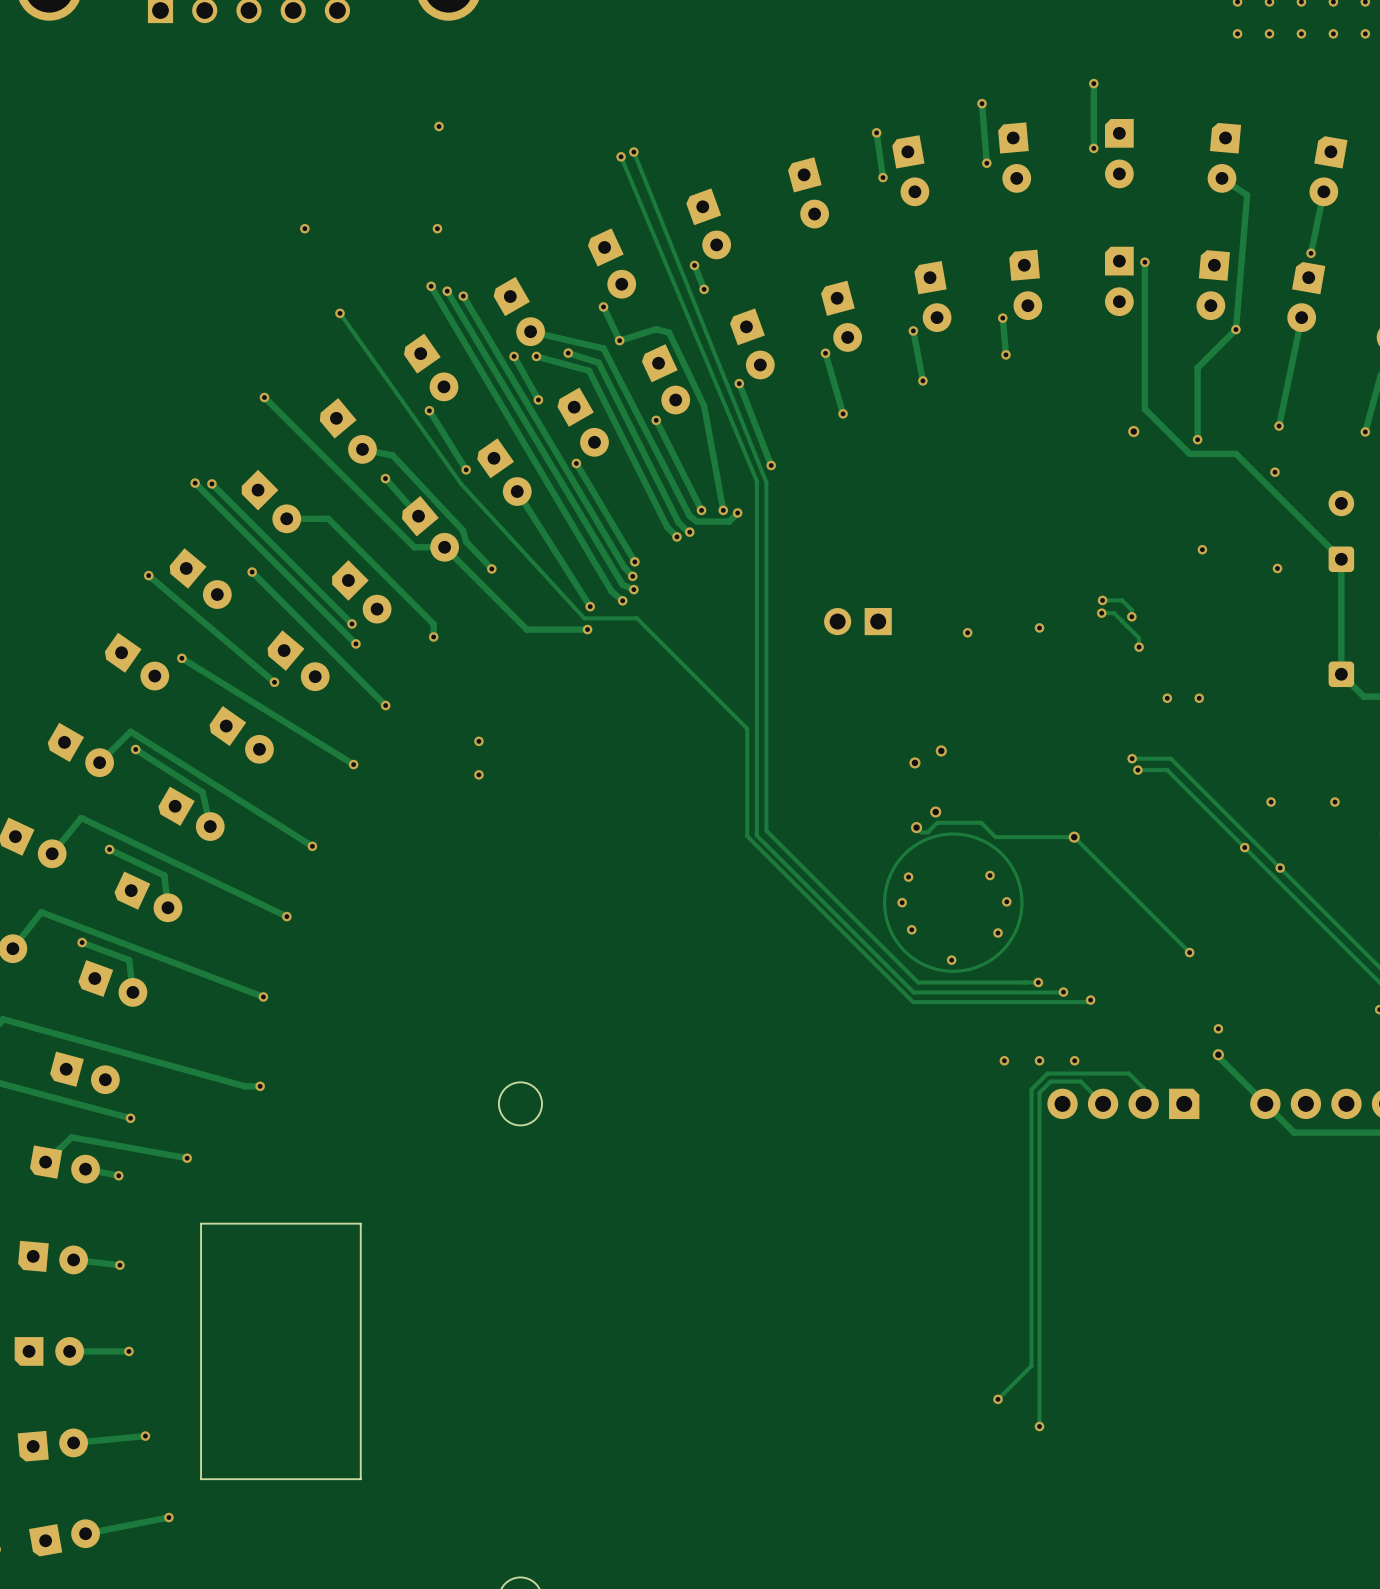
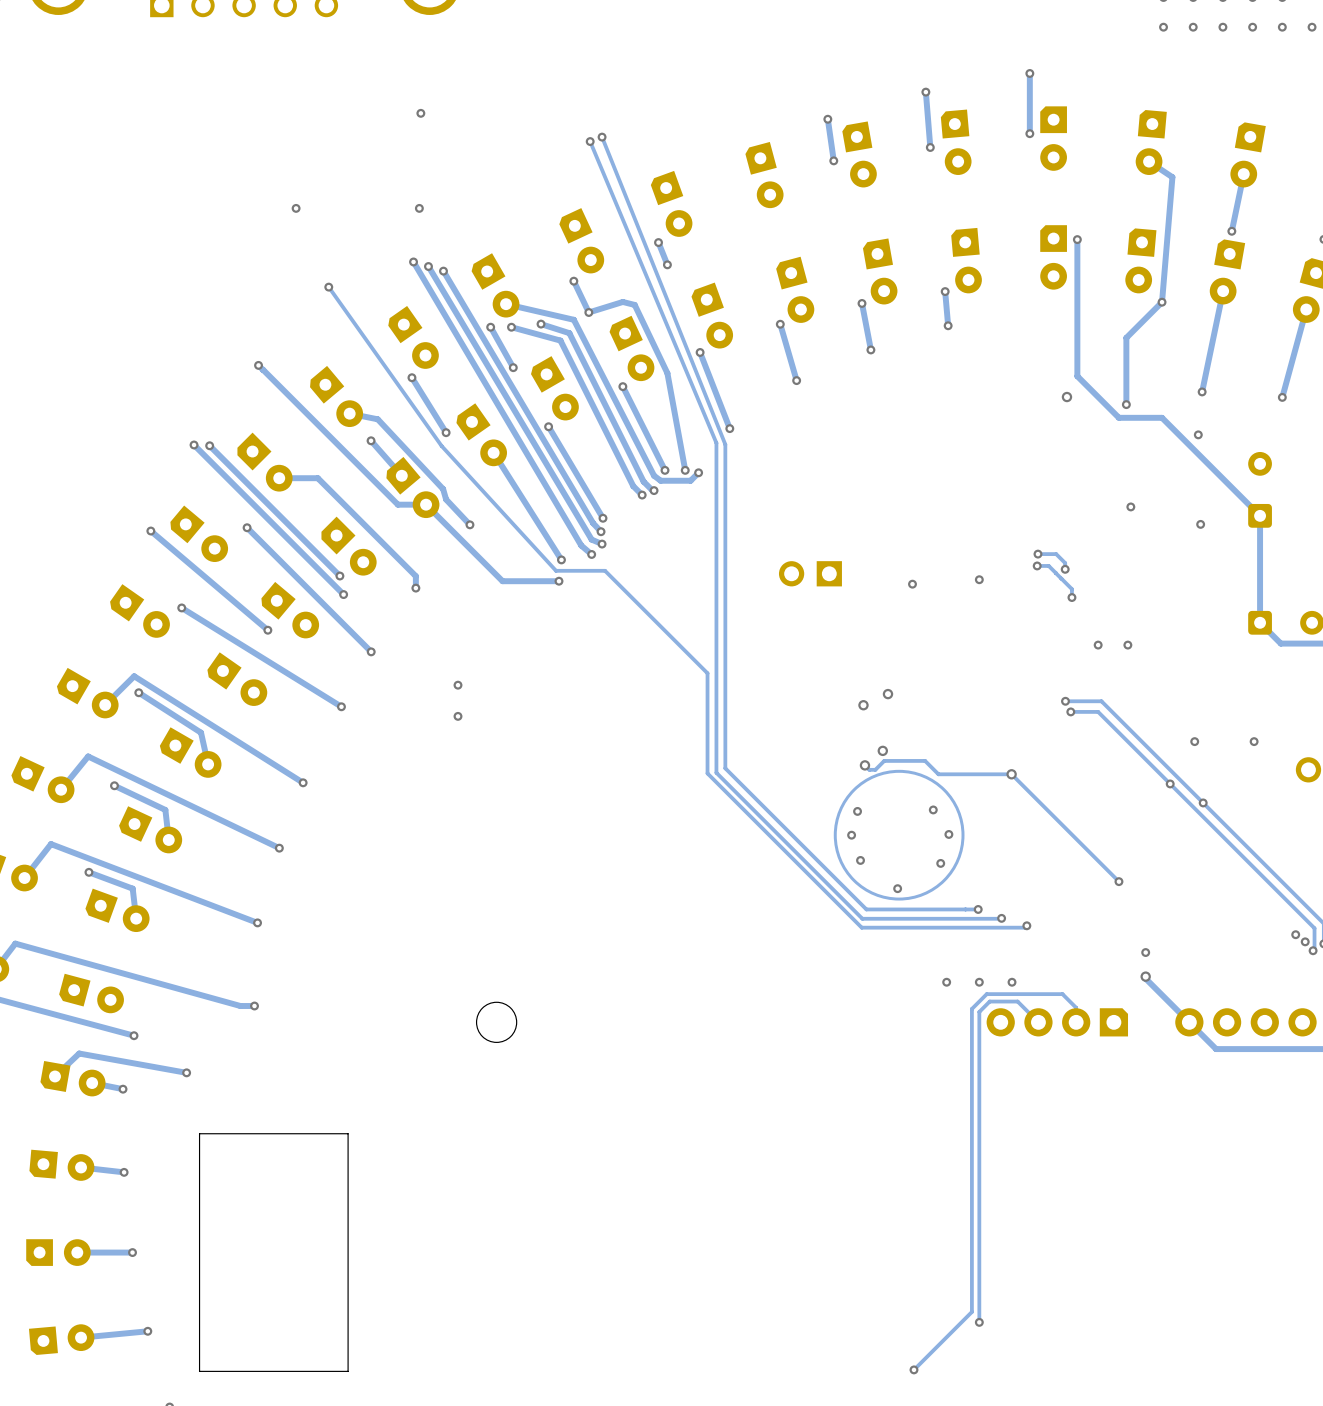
track: (1031, 1365) (997, 1399) -> (971, 1265) (971, 1311) (913, 1369)
via: (997, 1399) -> none
via: none -> (913, 1369)

